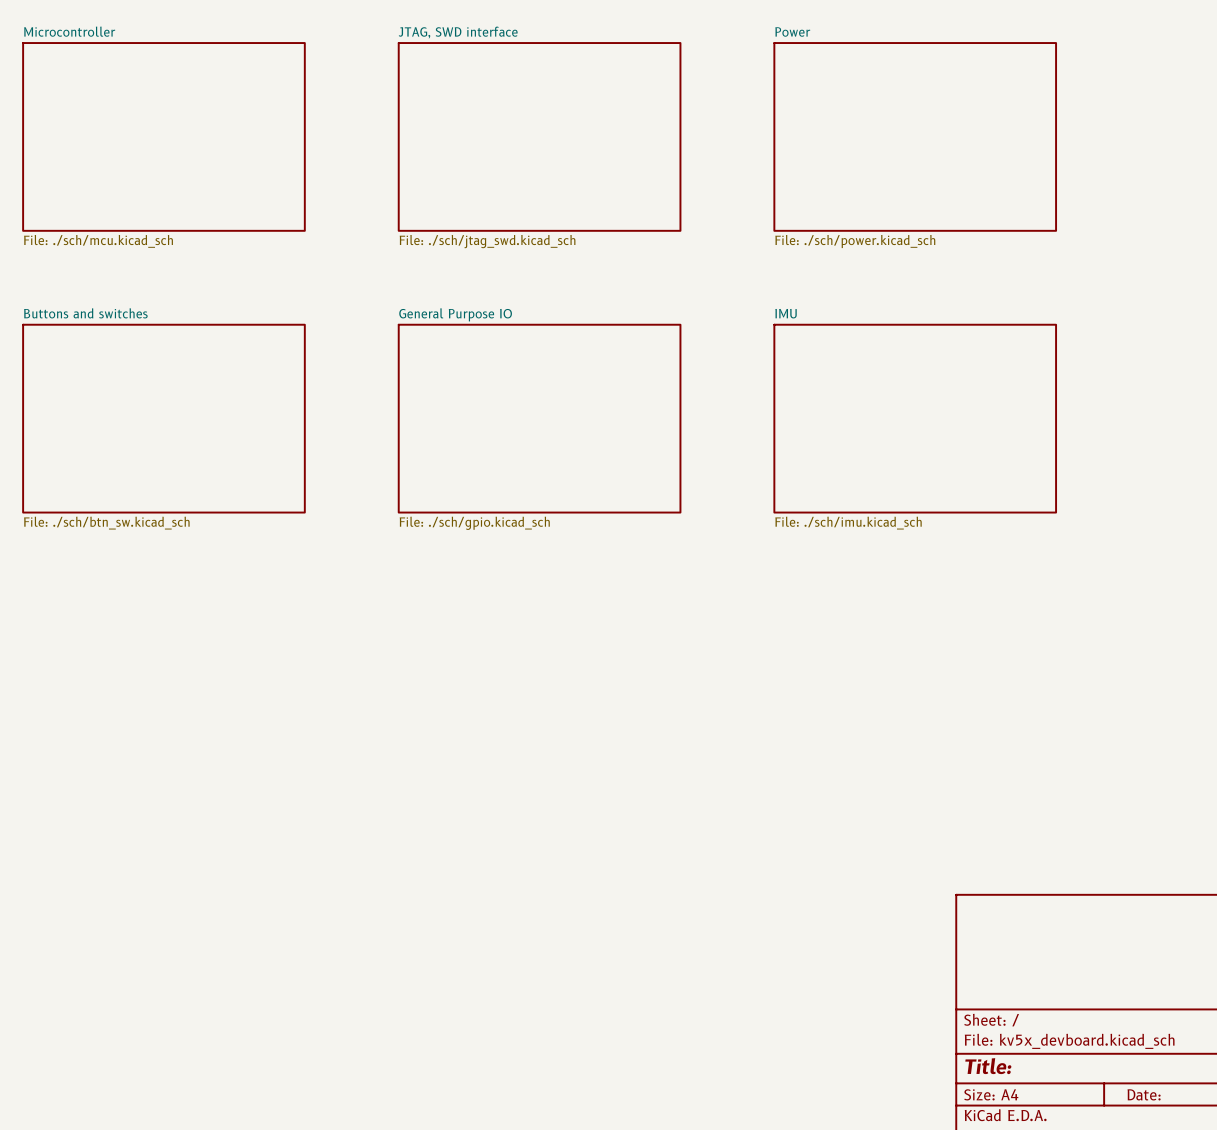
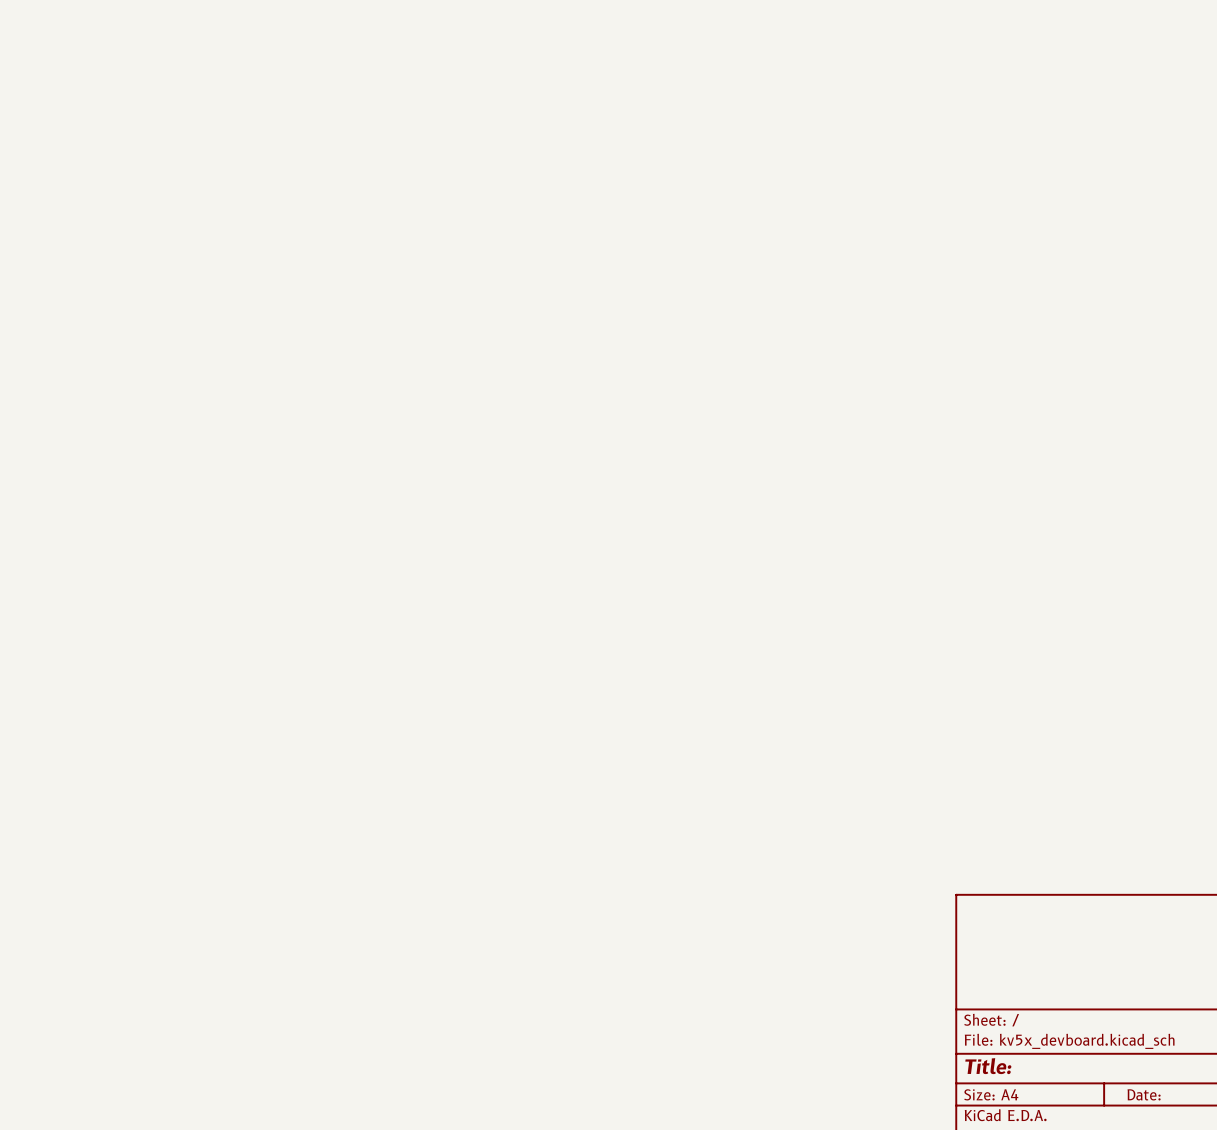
sheet Microcontroller: File: ./sch/mcu.kicad_sch (163, 136) -> none
sheet JTAG, SWD interface: File: ./sch/jtag_swd.kicad_sch (539, 136) -> none
sheet Power: File: ./sch/power.kicad_sch (915, 136) -> none
sheet Buttons and switches: File: ./sch/btn_sw.kicad_sch (163, 418) -> none
sheet General Purpose IO: File: ./sch/gpio.kicad_sch (539, 418) -> none
sheet IMU: File: ./sch/imu.kicad_sch (915, 418) -> none

